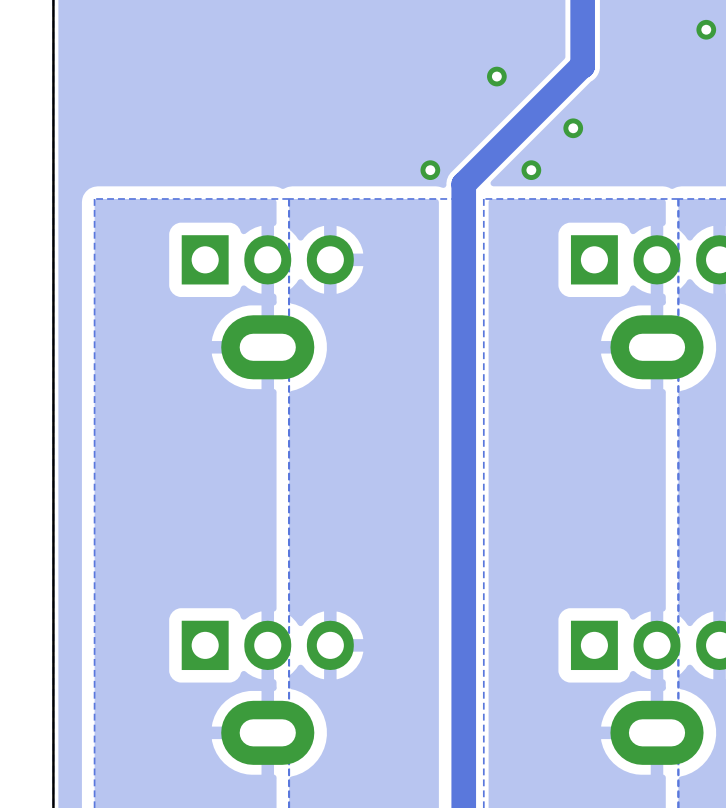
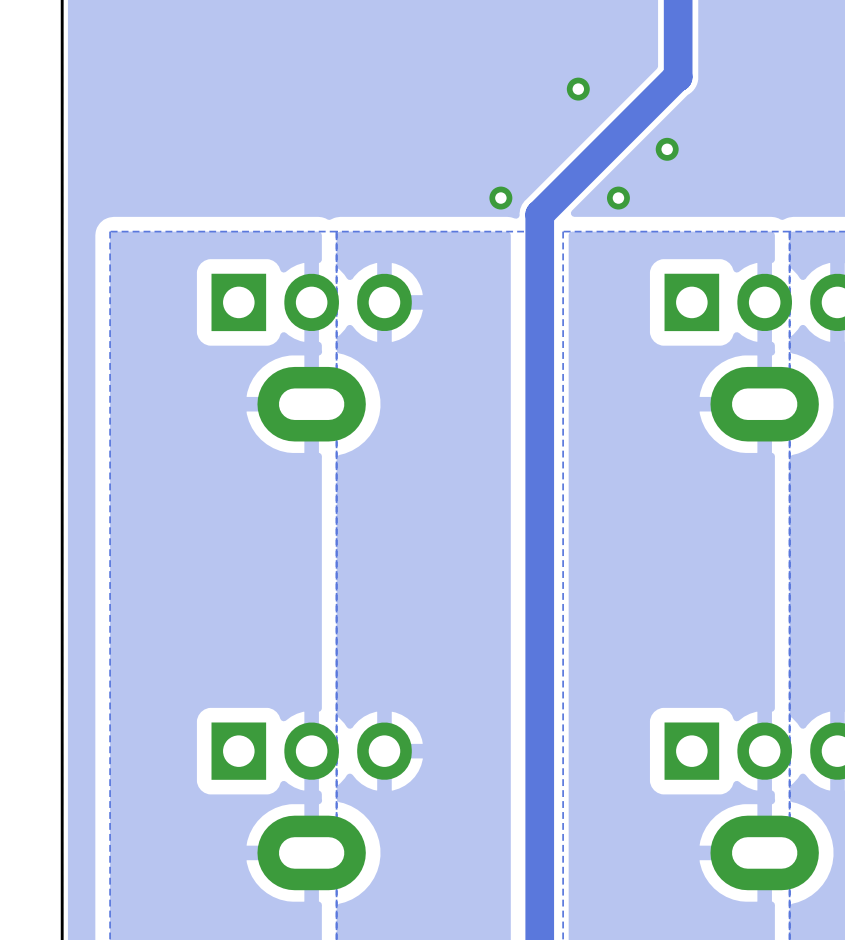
via: (706, 29) -> none

